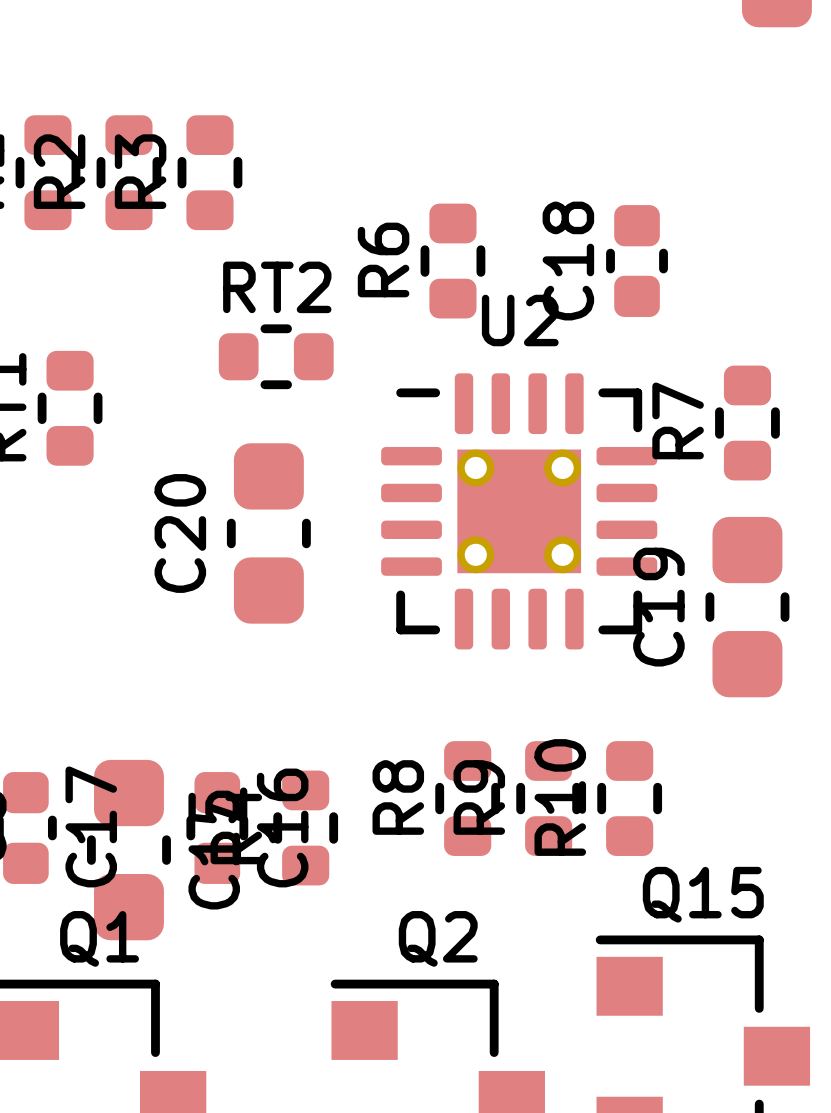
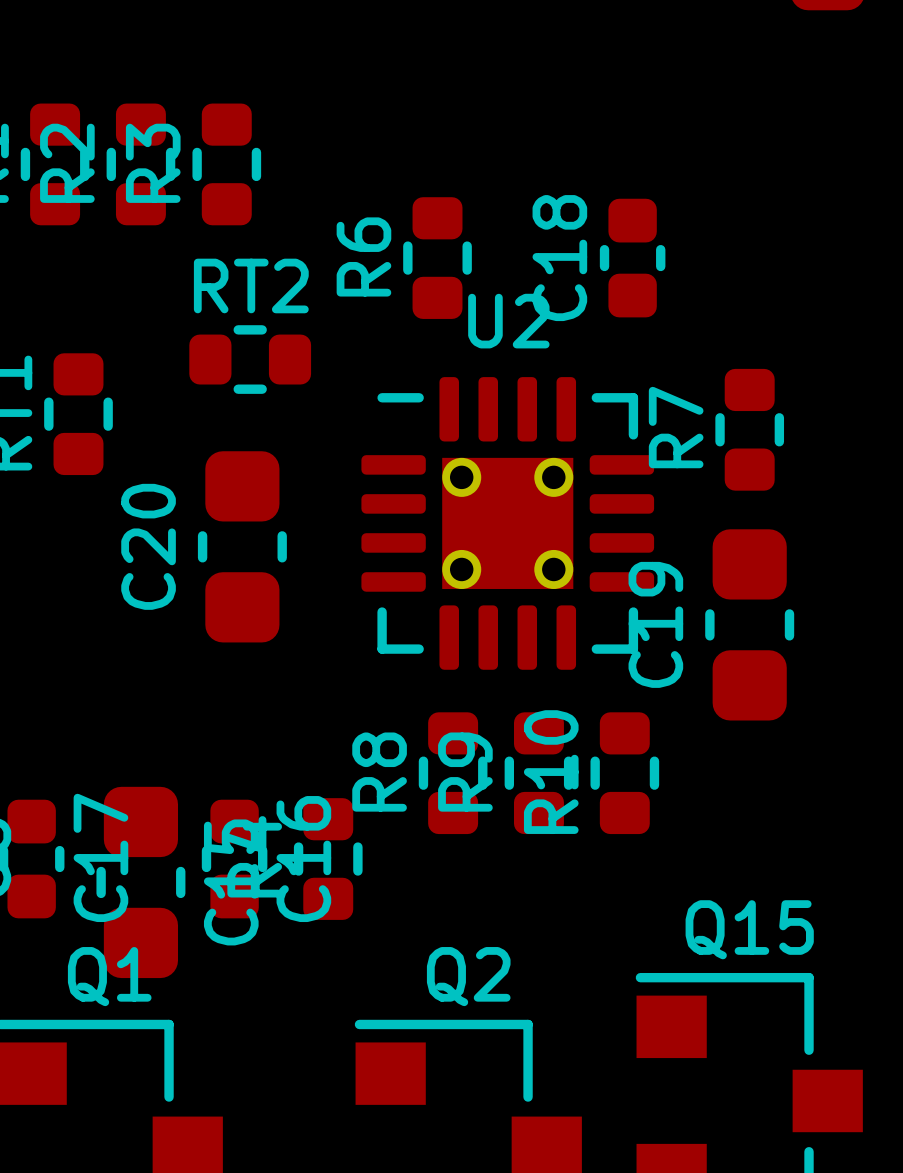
R6 position: (452, 261) -> (437, 258)
C18 position: (637, 261) -> (632, 258)
RT2 position: (276, 356) -> (250, 359)
R7 position: (747, 423) -> (749, 429)
U2 position: (519, 511) -> (507, 523)
C20 position: (268, 533) -> (242, 546)
C19 position: (747, 607) -> (749, 624)
R8 position: (467, 798) -> (453, 773)
R9 position: (548, 798) -> (538, 773)
R10 position: (629, 798) -> (624, 773)

